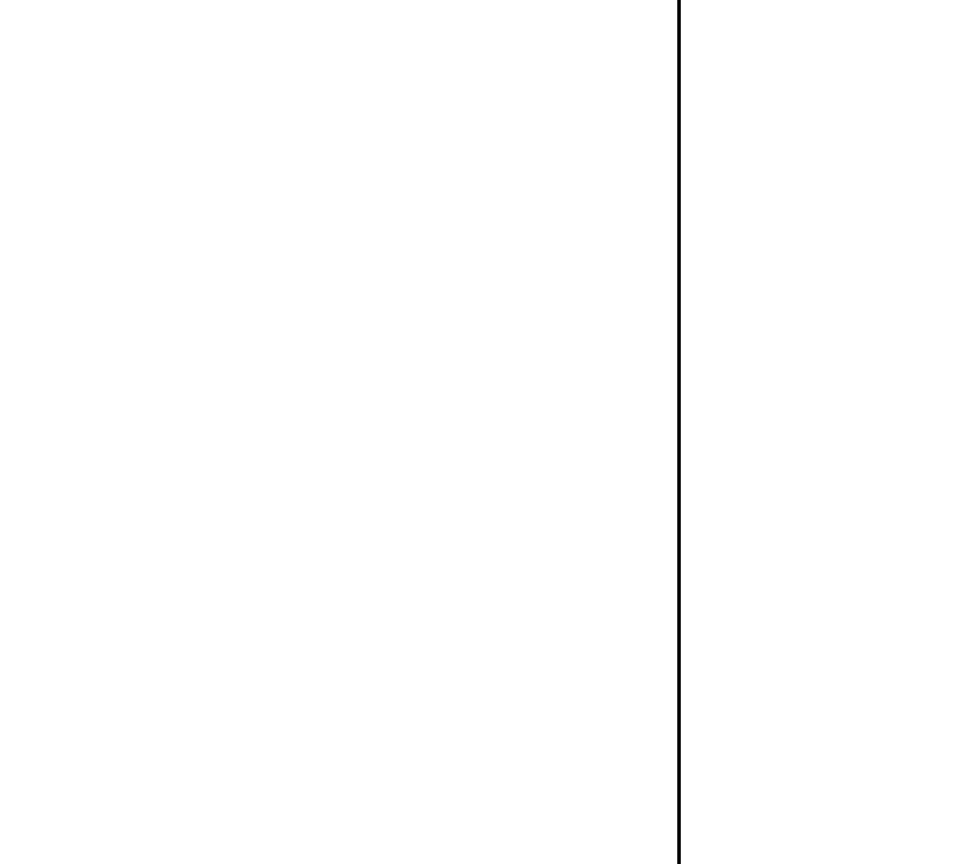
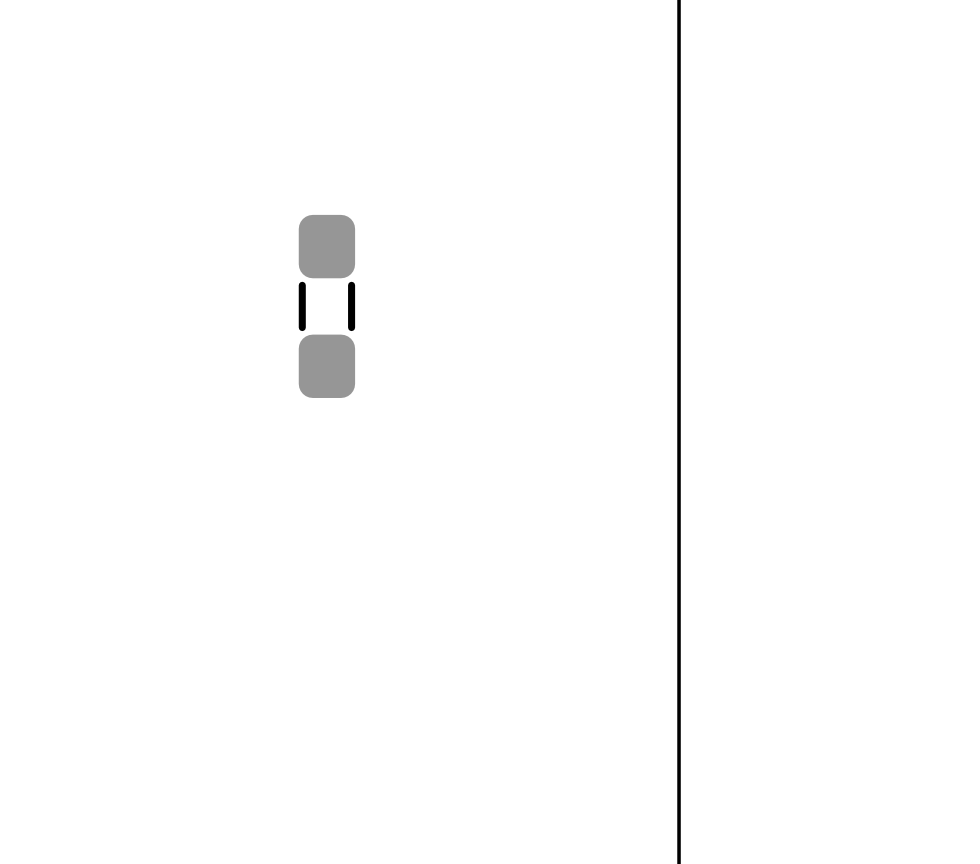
part: none -> (326, 306)

